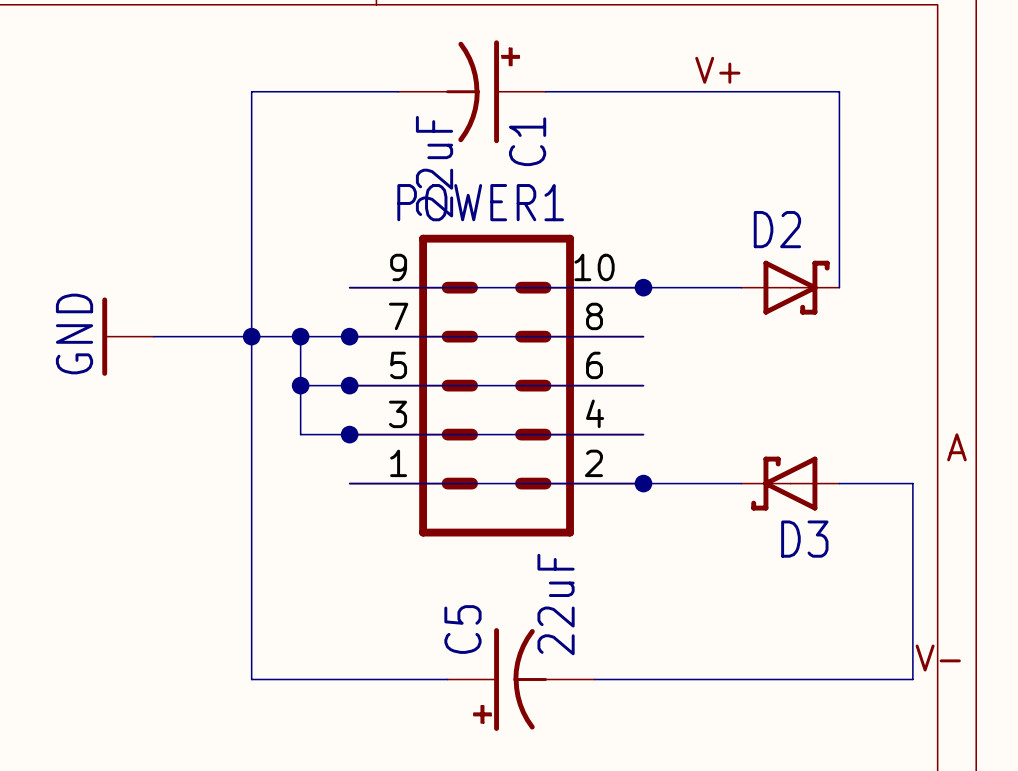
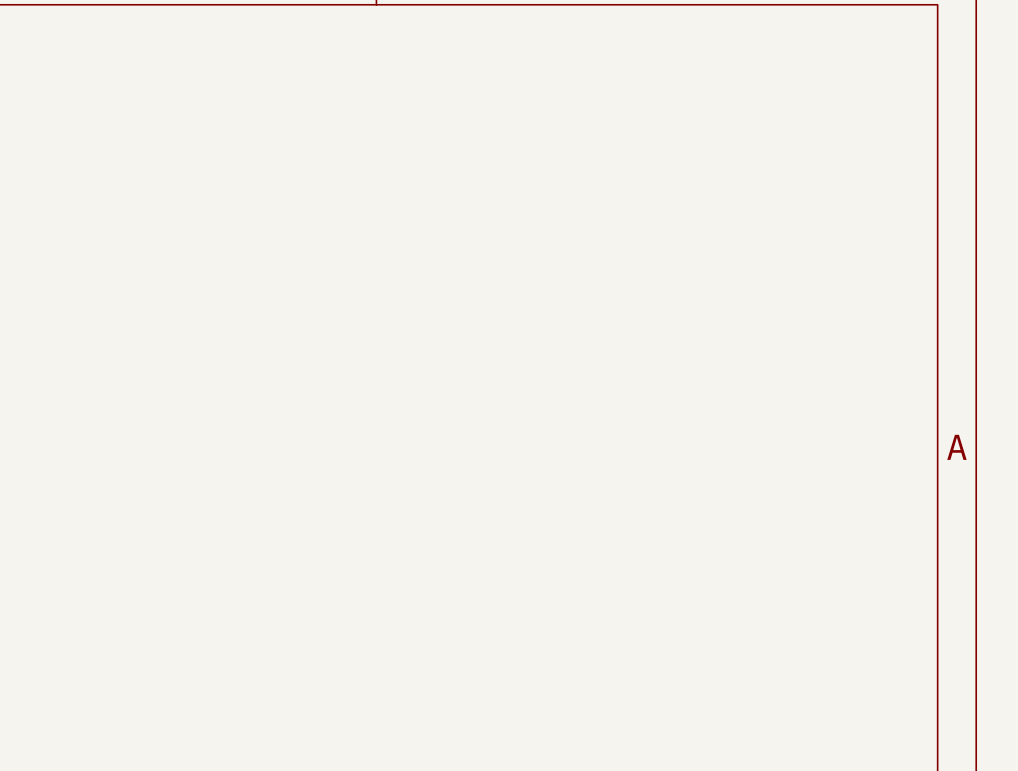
label: V+ (717, 70) -> none
wire: (398, 91) (251, 91) (251, 679) (447, 679) -> none
C1: 22uF (472, 91) -> none
wire: (545, 91) (839, 91) (839, 287) -> none
wire: (349, 287) (741, 287) -> none
junction: (643, 287) -> none
D2: (790, 287) -> none
power symbol: GND (127, 336) -> none
wire: (153, 336) (643, 336) -> none
junction: (251, 336) -> none
wire: (300, 336) (300, 434) (643, 434) -> none
junction: (300, 336) -> none
junction: (349, 336) -> none
wire: (300, 385) (643, 385) -> none
junction: (300, 385) -> none
junction: (349, 385) -> none
POWER1: (496, 385) -> none
junction: (349, 434) -> none
wire: (349, 483) (741, 483) -> none
junction: (643, 483) -> none
D3: (790, 483) -> none
wire: (839, 483) (912, 483) (912, 679) (594, 679) -> none
label: V- (938, 658) -> none
C5: 22uF (521, 679) -> none

